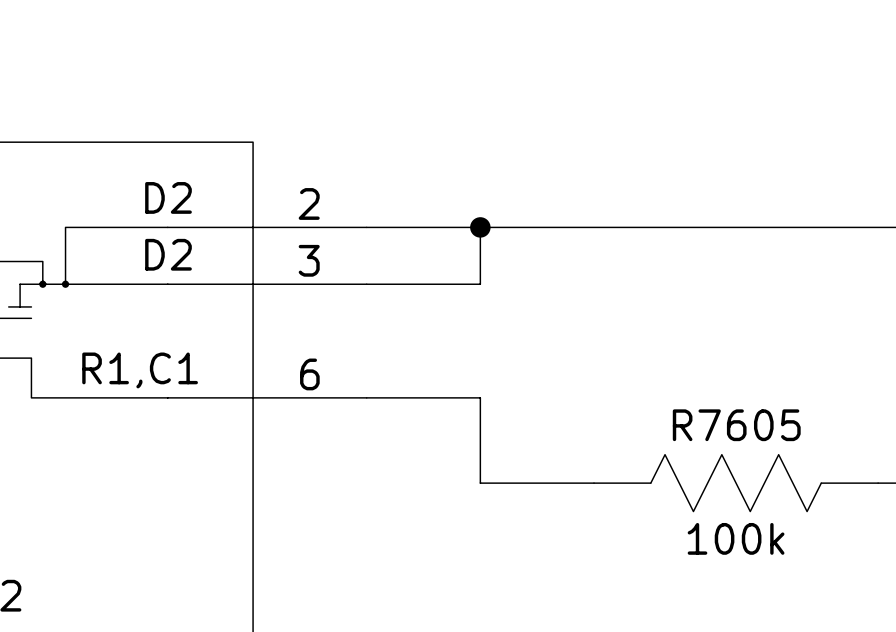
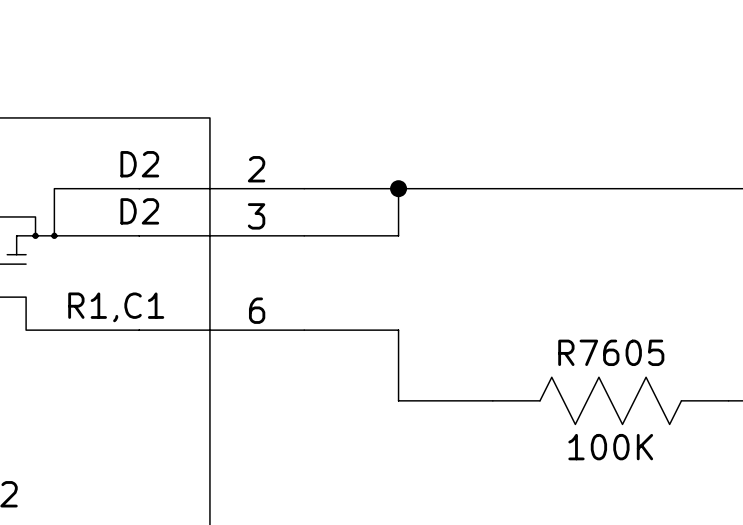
R7605 value: 100k (736, 538) -> 100K (610, 447)

